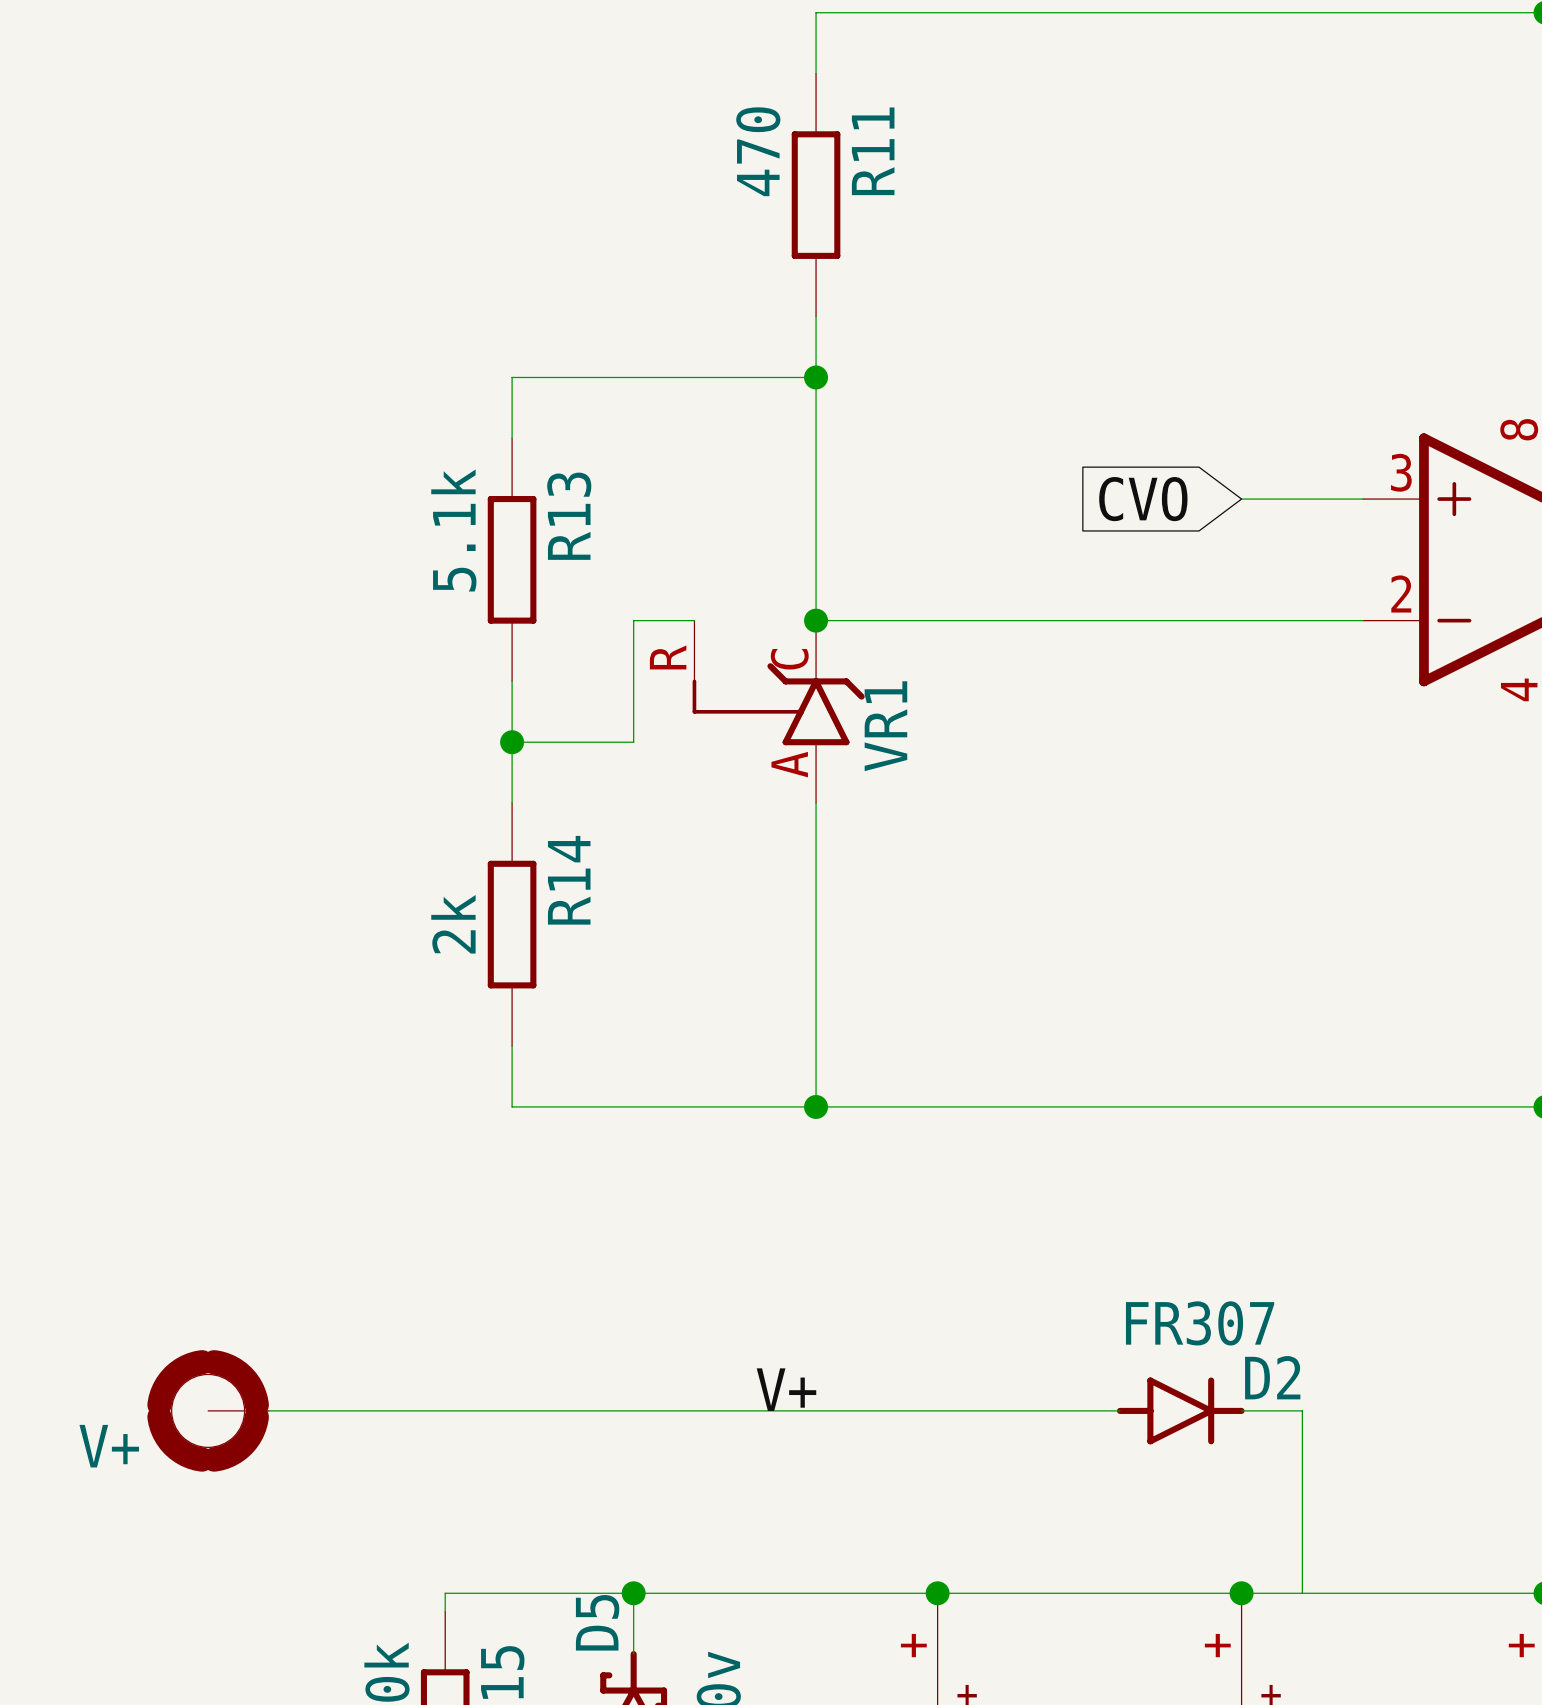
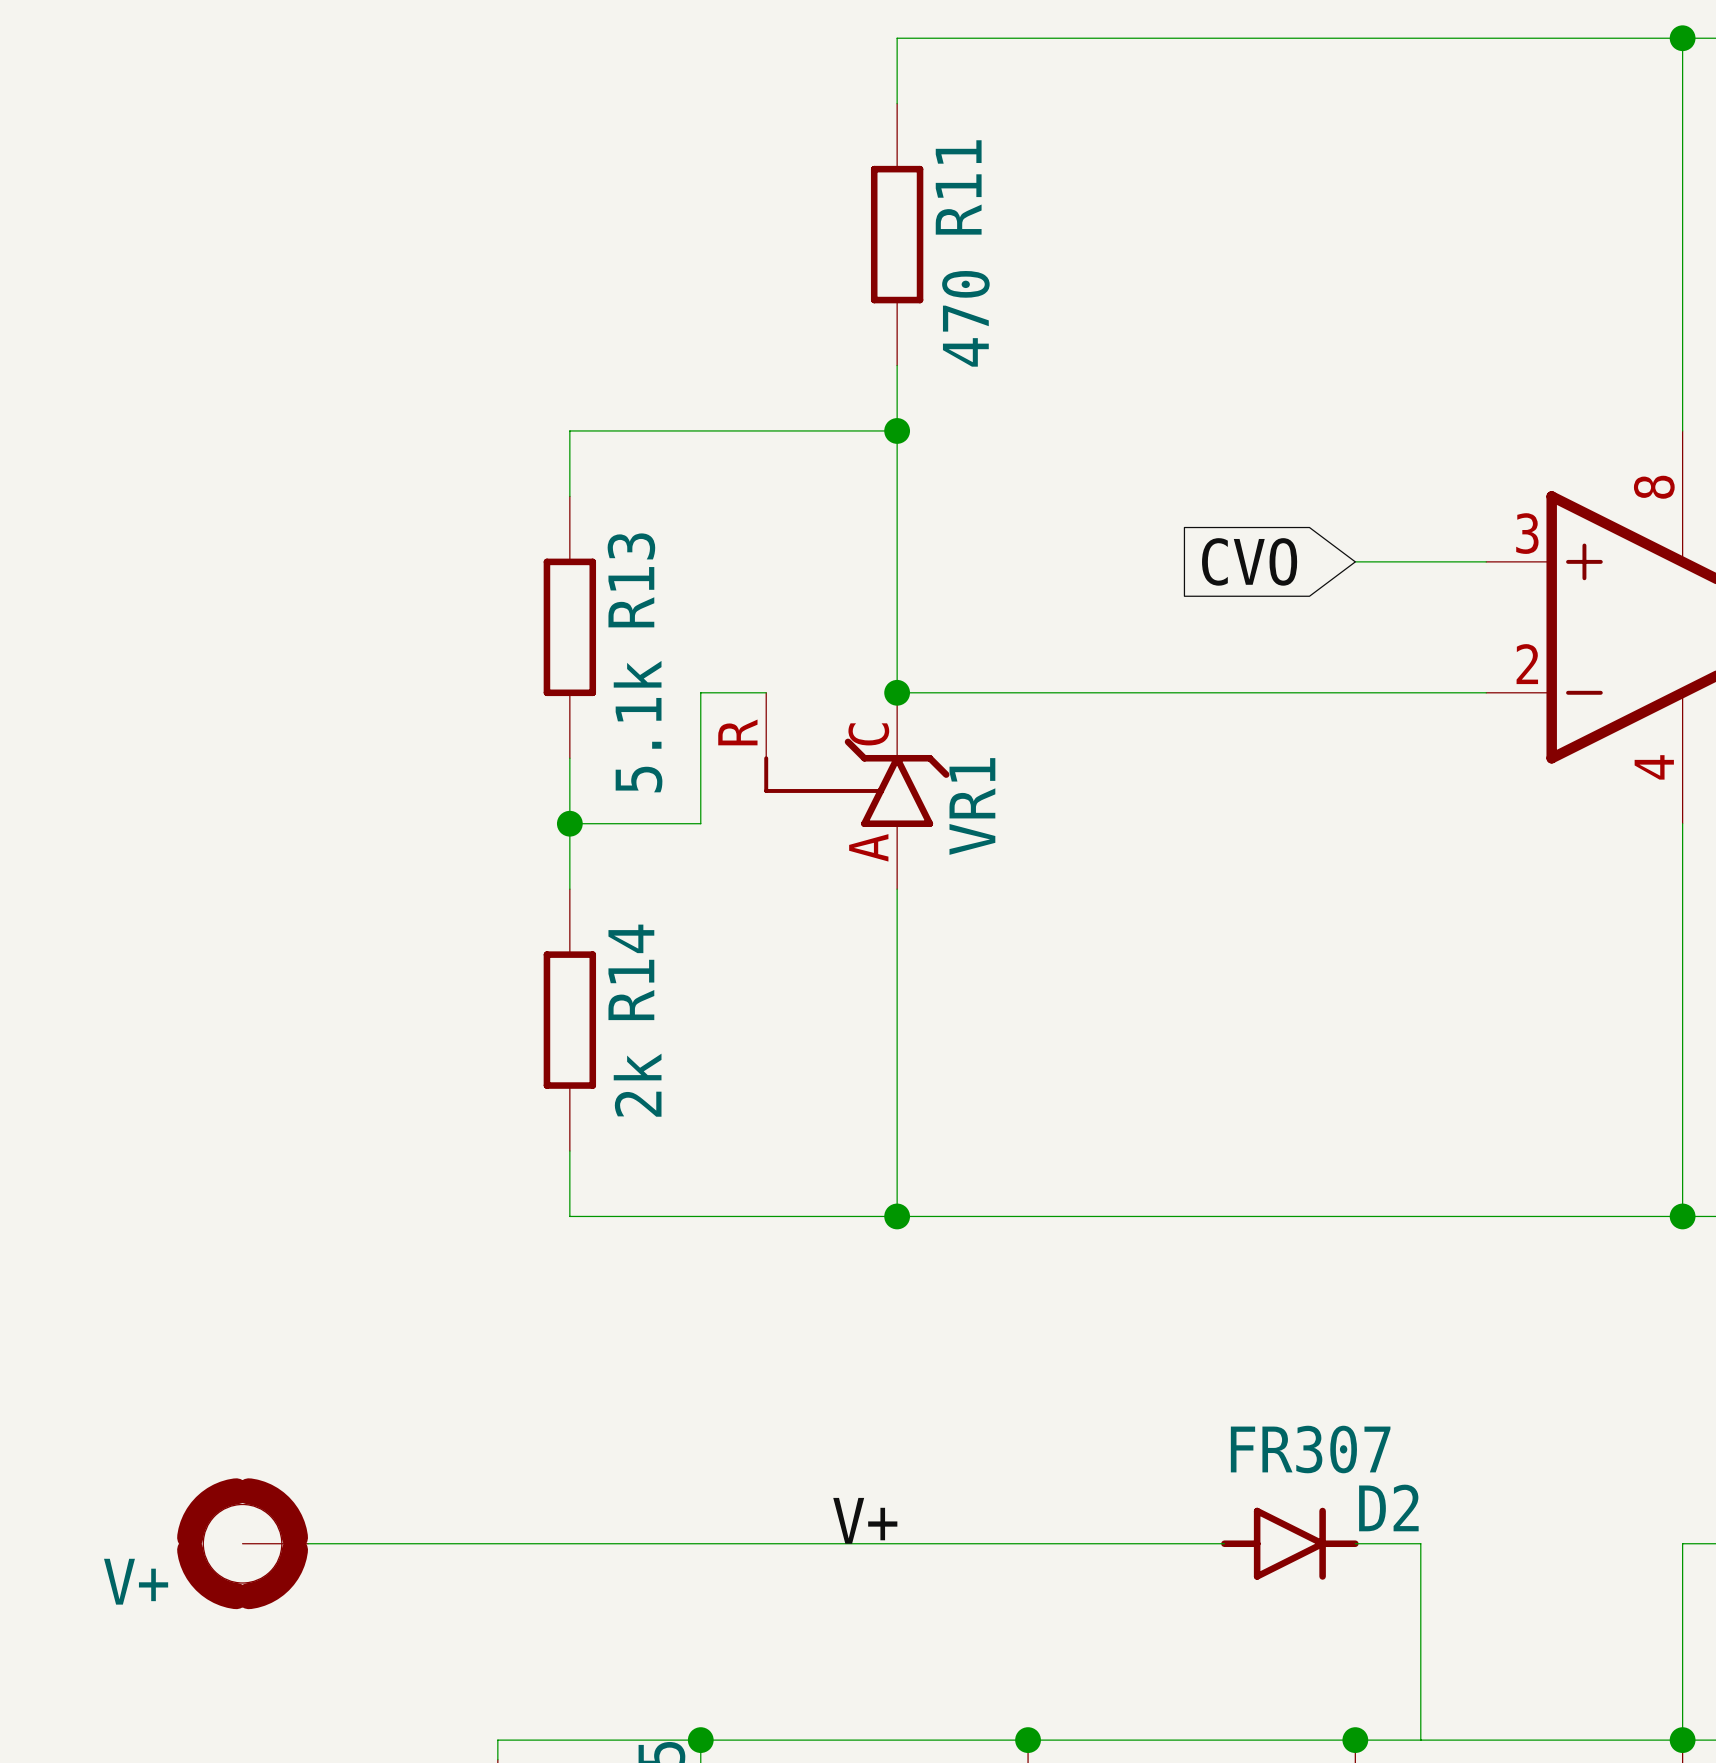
R11 value position: 470 (758, 151) -> 470 (965, 318)
R13 value position: 5.1k (453, 530) -> 5.1k (638, 726)
R14 value position: 2k (453, 924) -> 2k (637, 1085)

